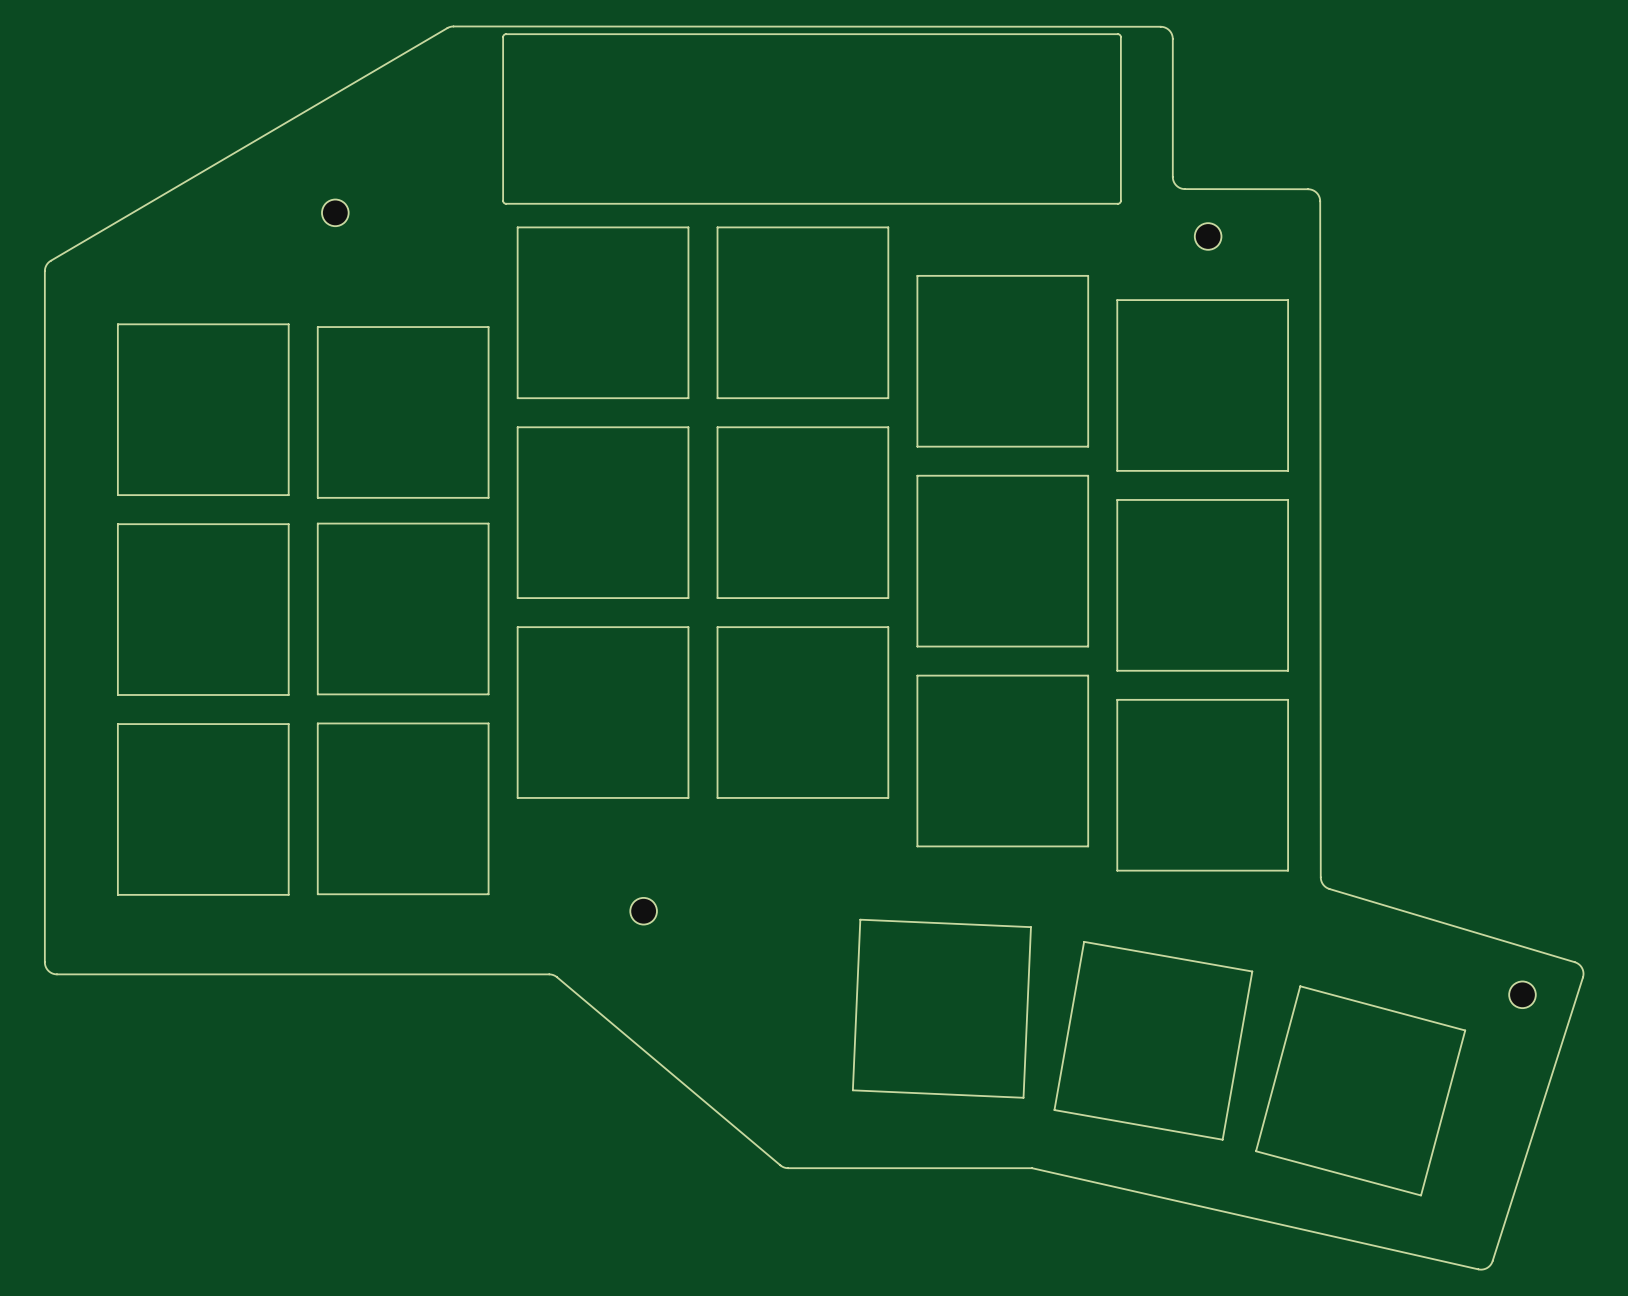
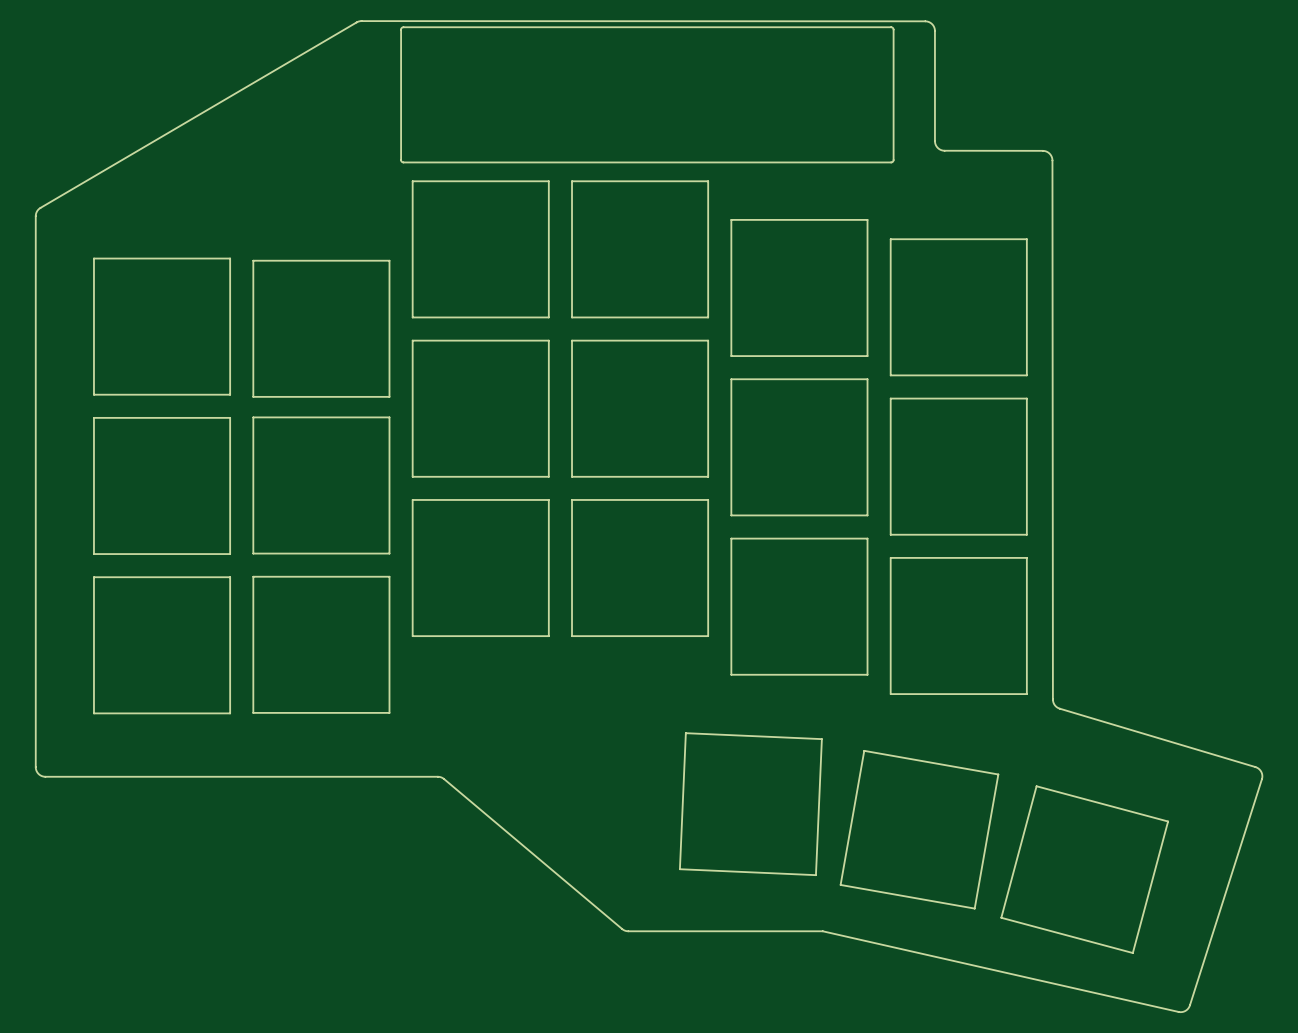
part: (335, 212) -> none
part: (1208, 236) -> none
part: (643, 911) -> none
part: (1522, 994) -> none

